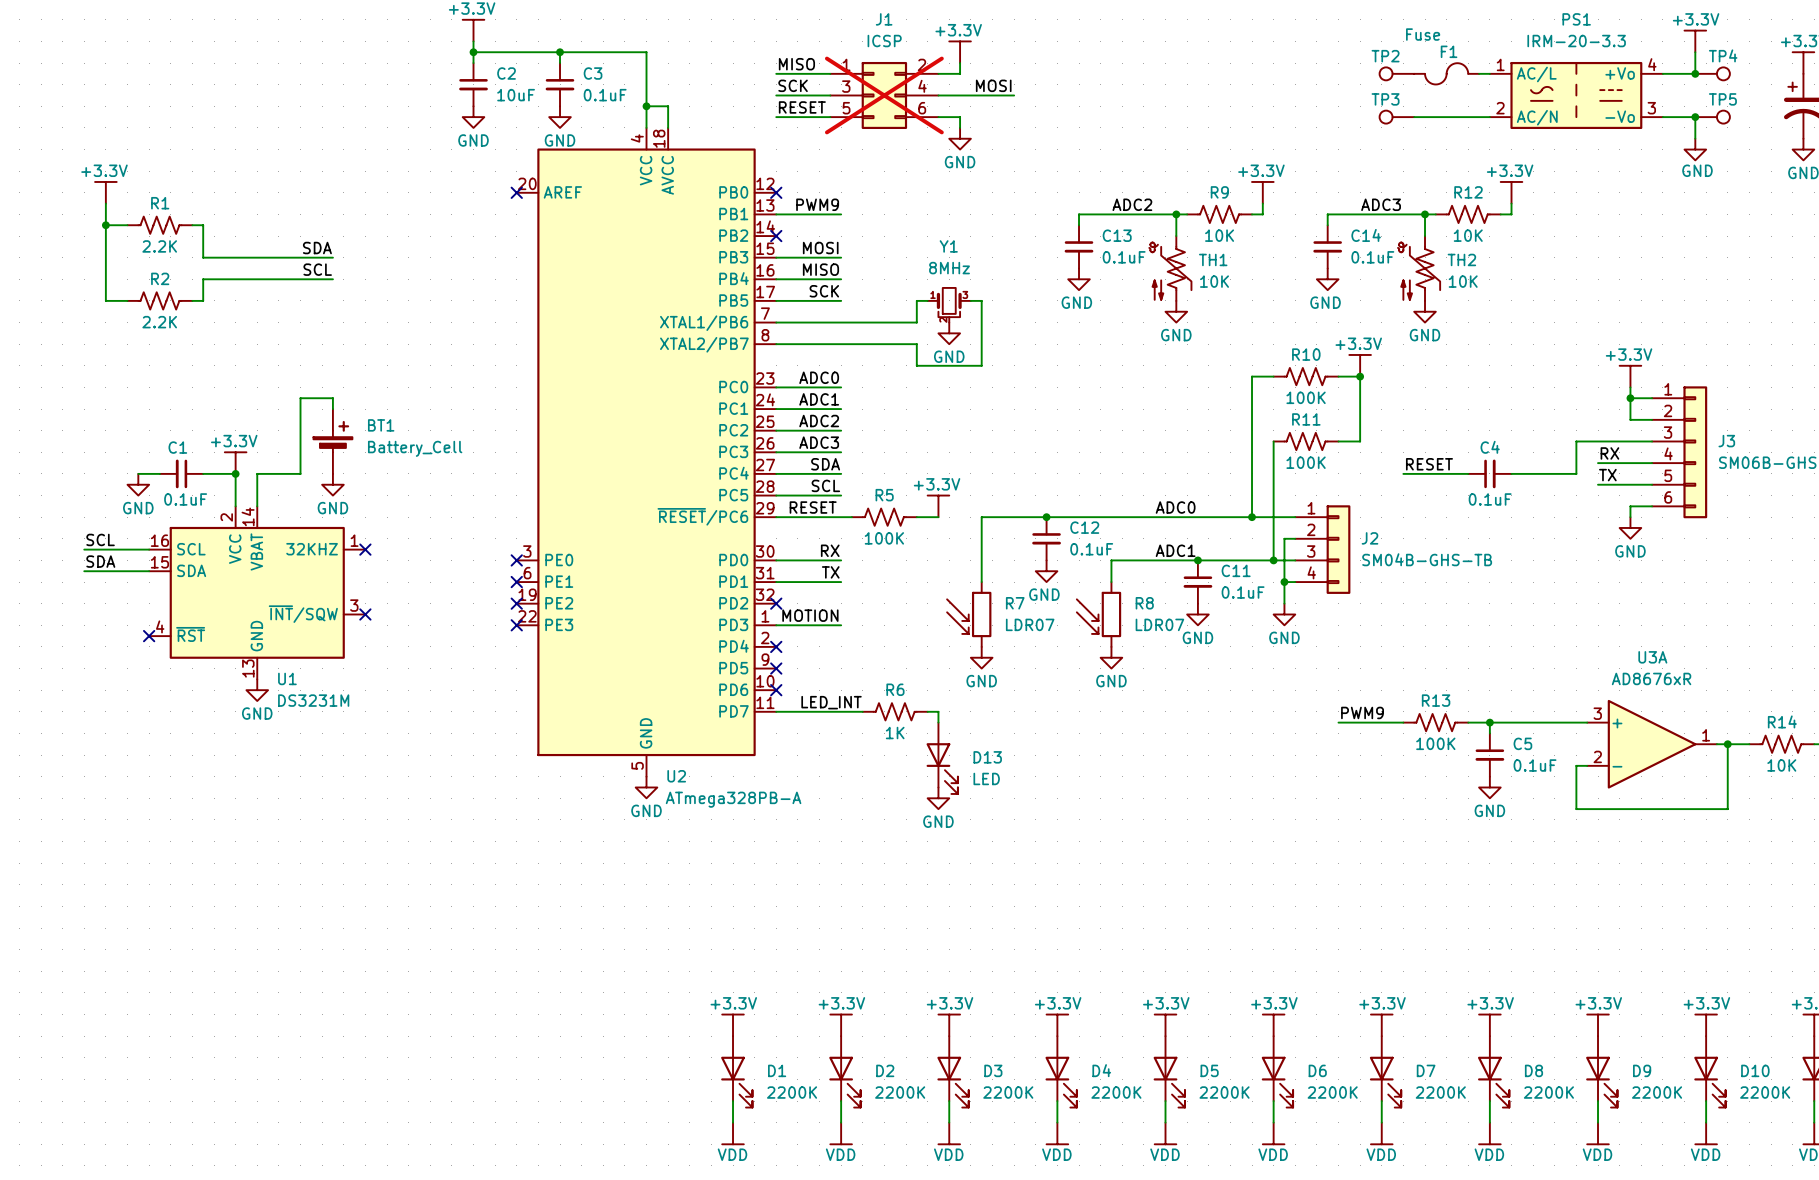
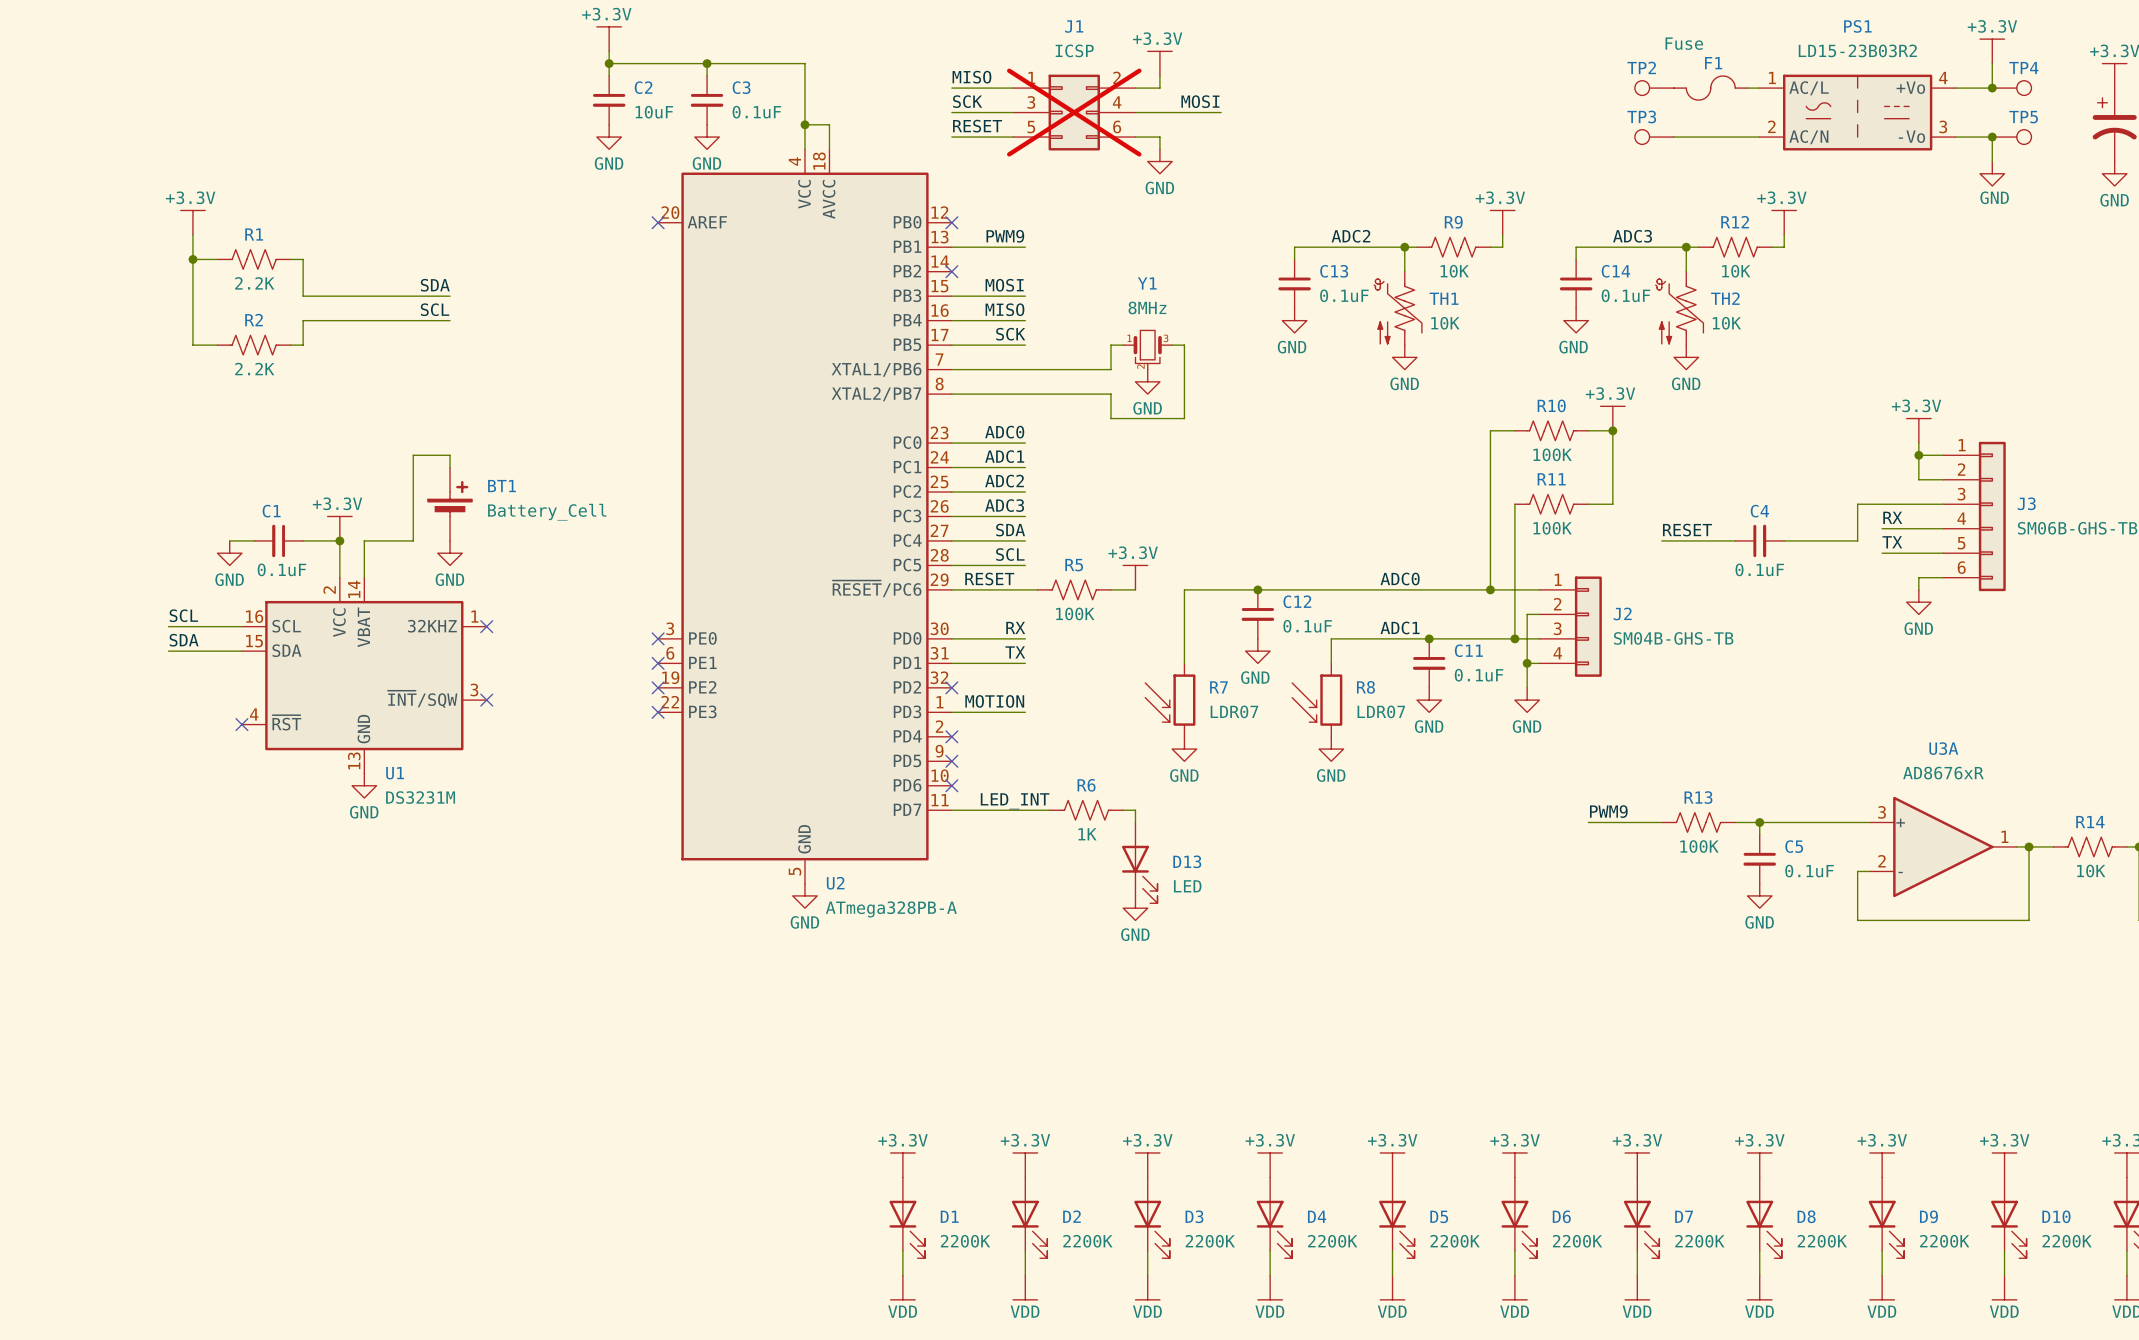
PS1 value: IRM-20-3.3 (1576, 41) -> LD15-23B03R2 (1857, 50)

